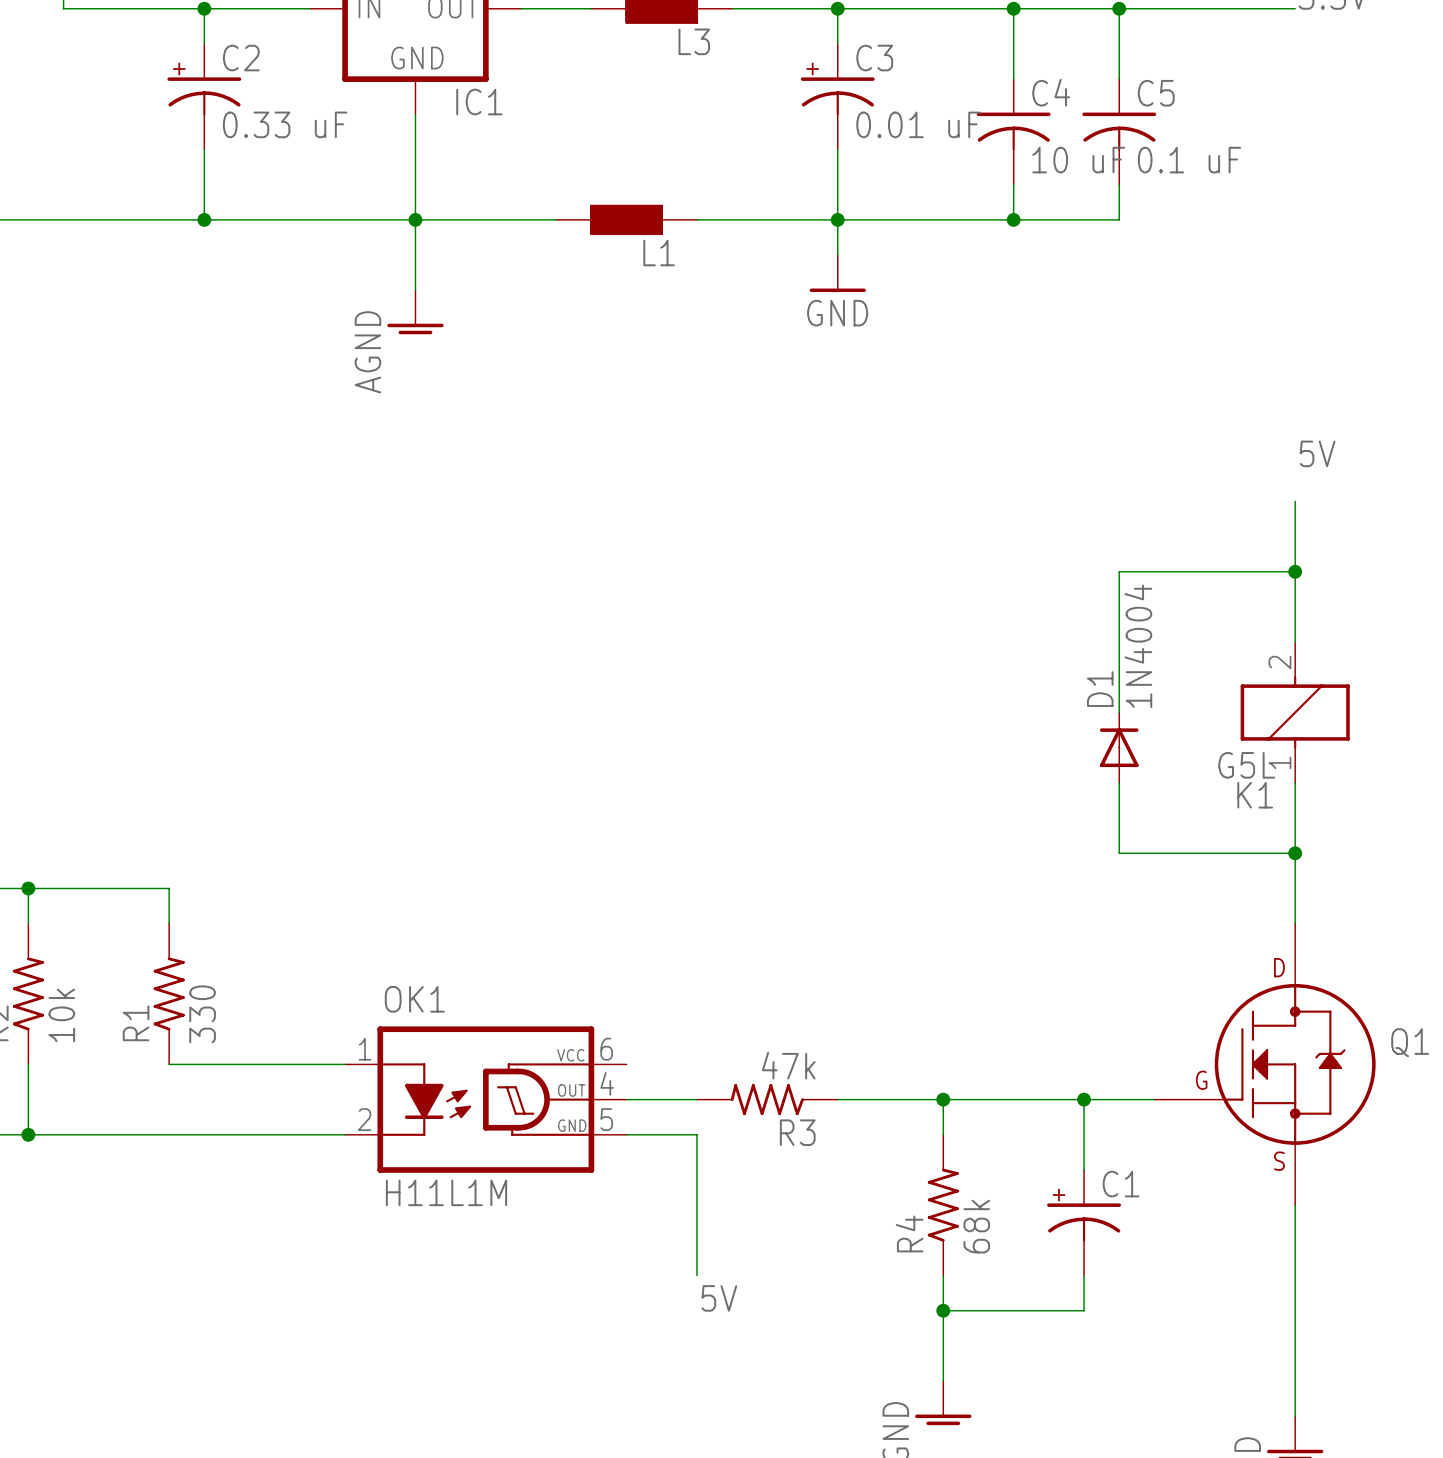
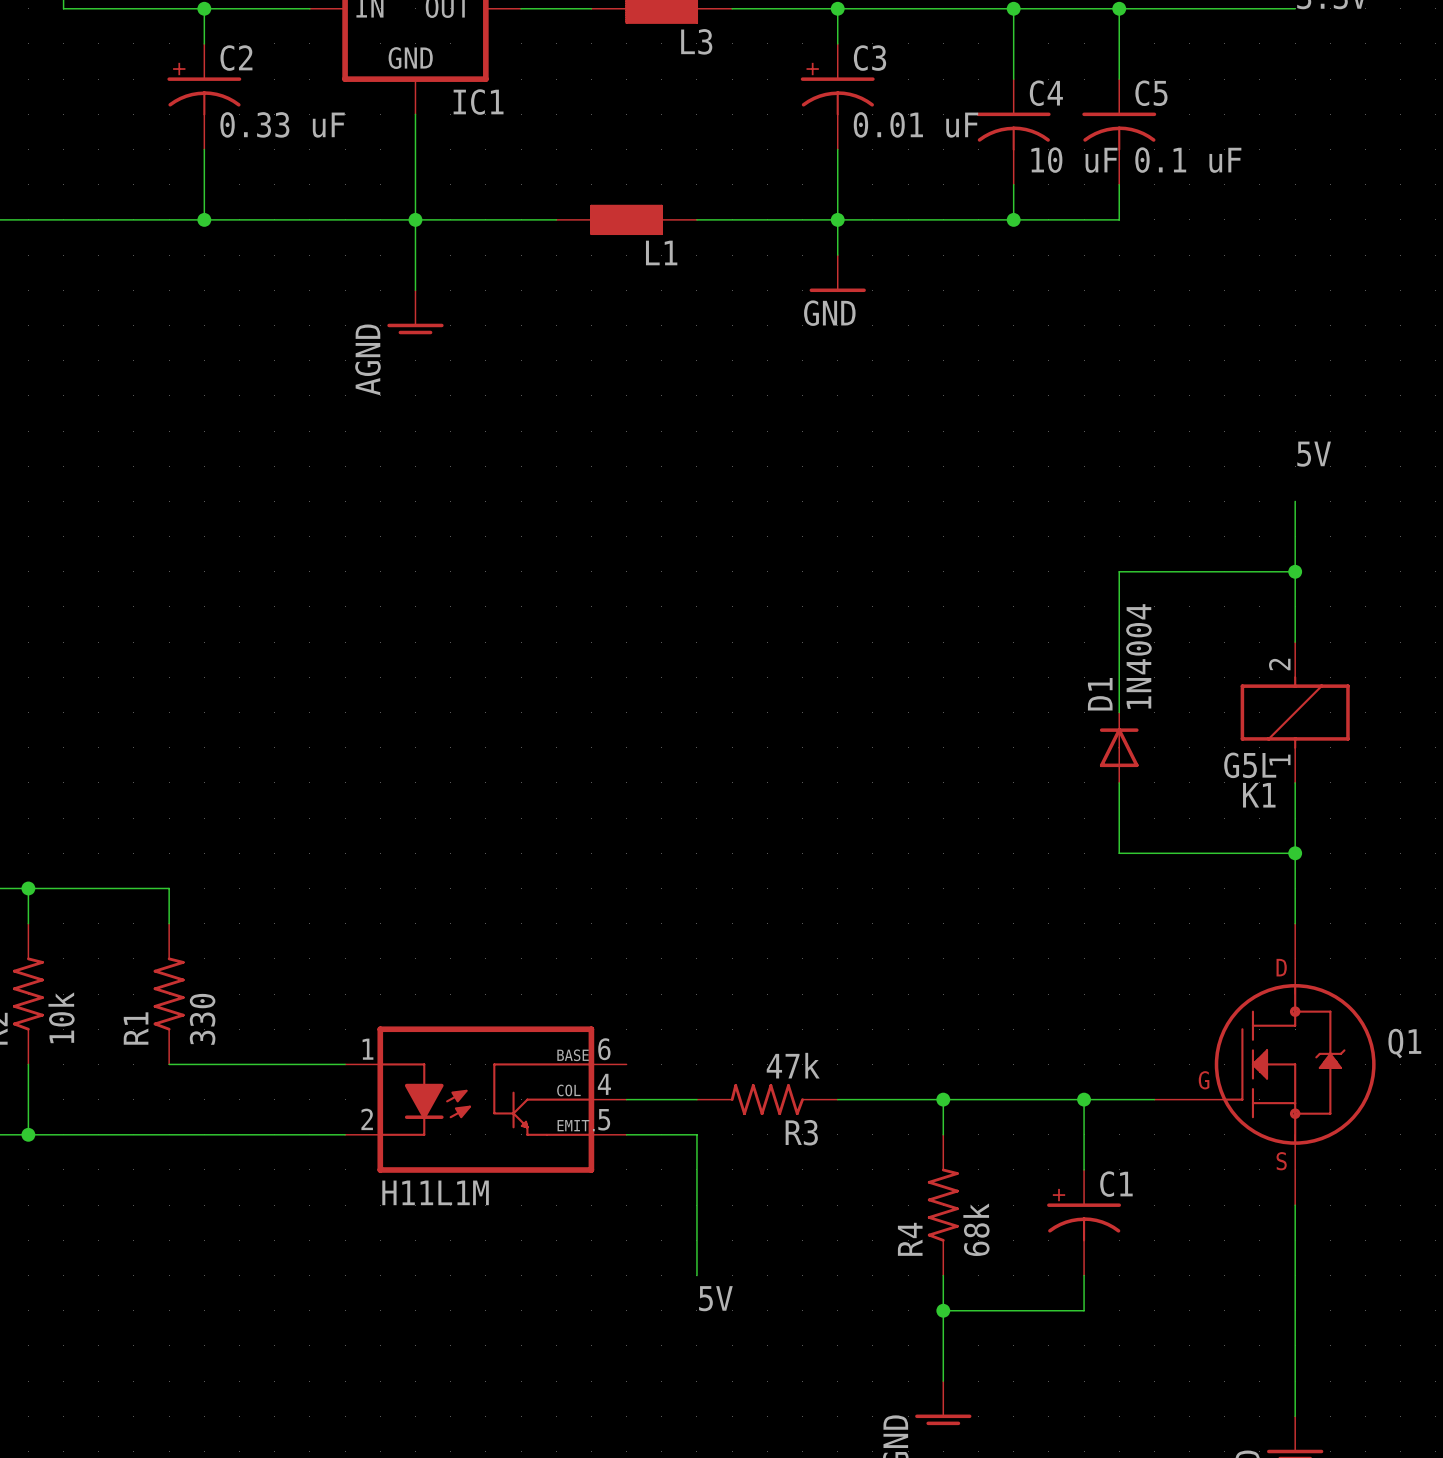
OK1: H11L1M (485, 1099) -> none
part: none -> H11L1M (485, 1099)

